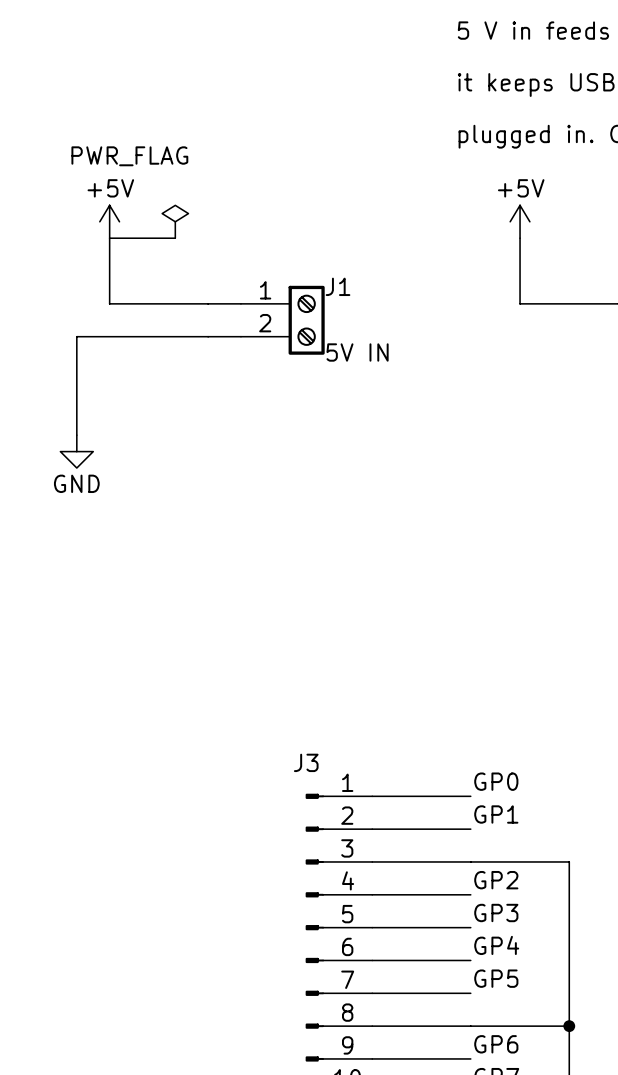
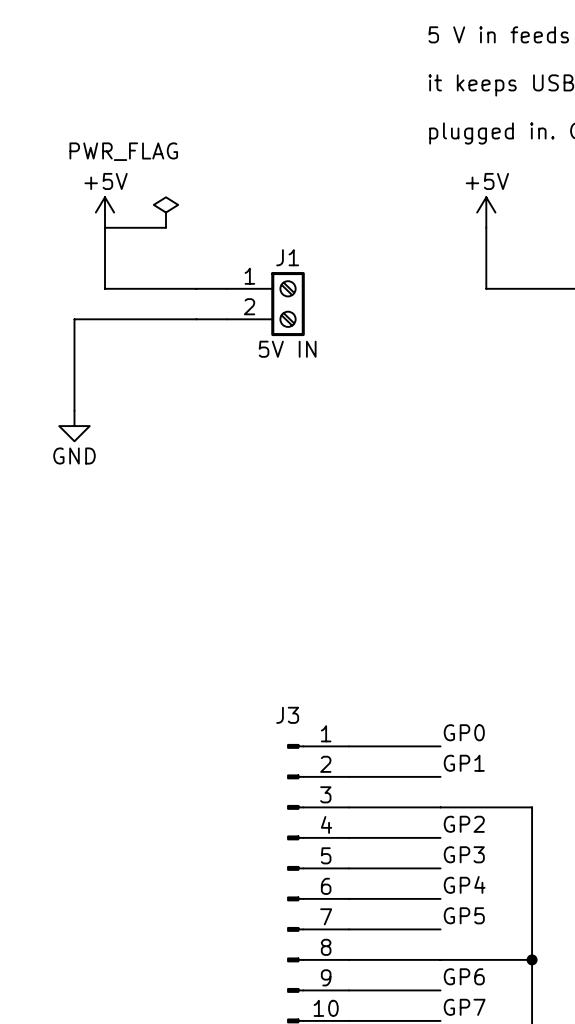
J1 name position: J1 (338, 286) -> J1 (287, 257)
J1 value position: 5V IN (357, 352) -> 5V IN (287, 349)

